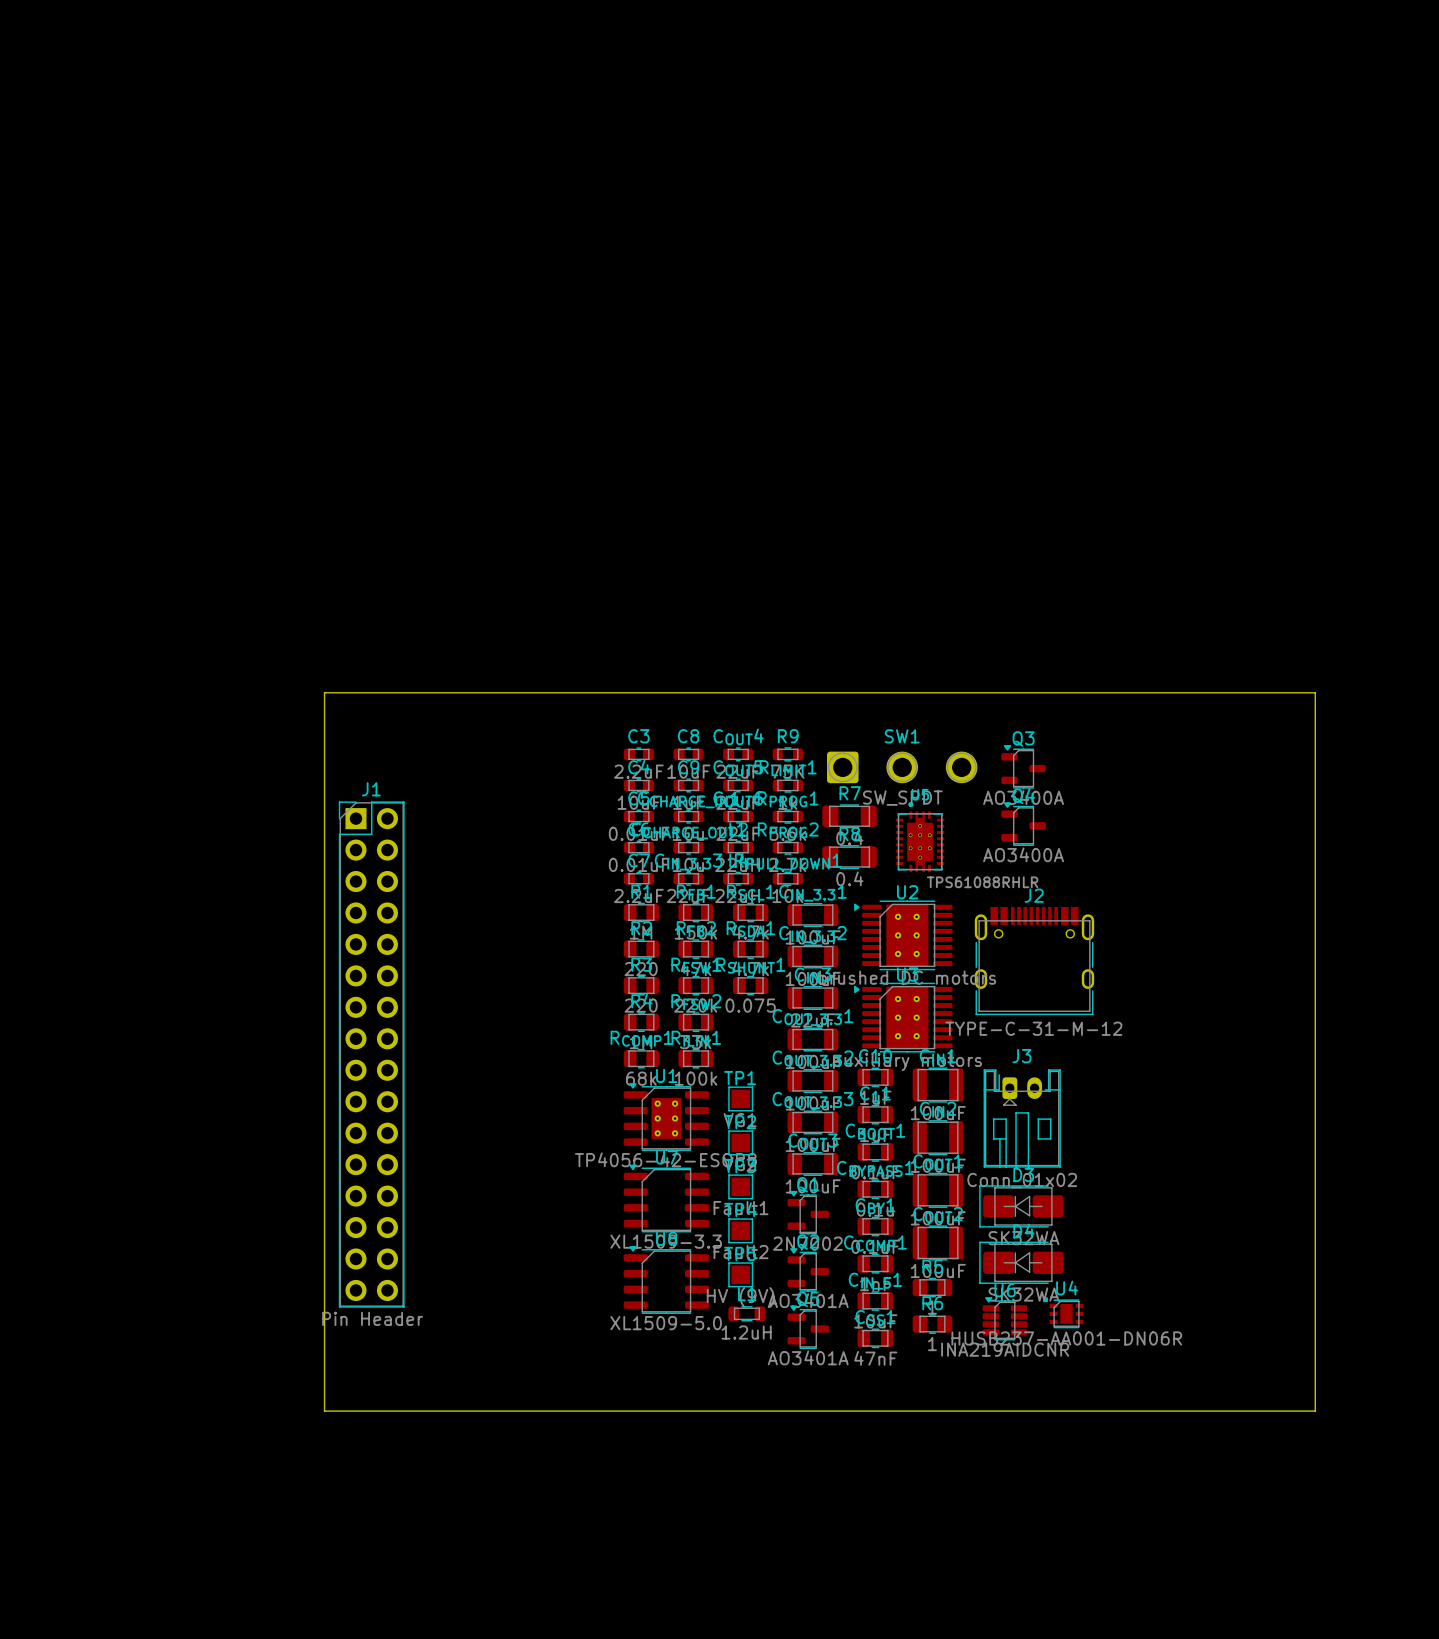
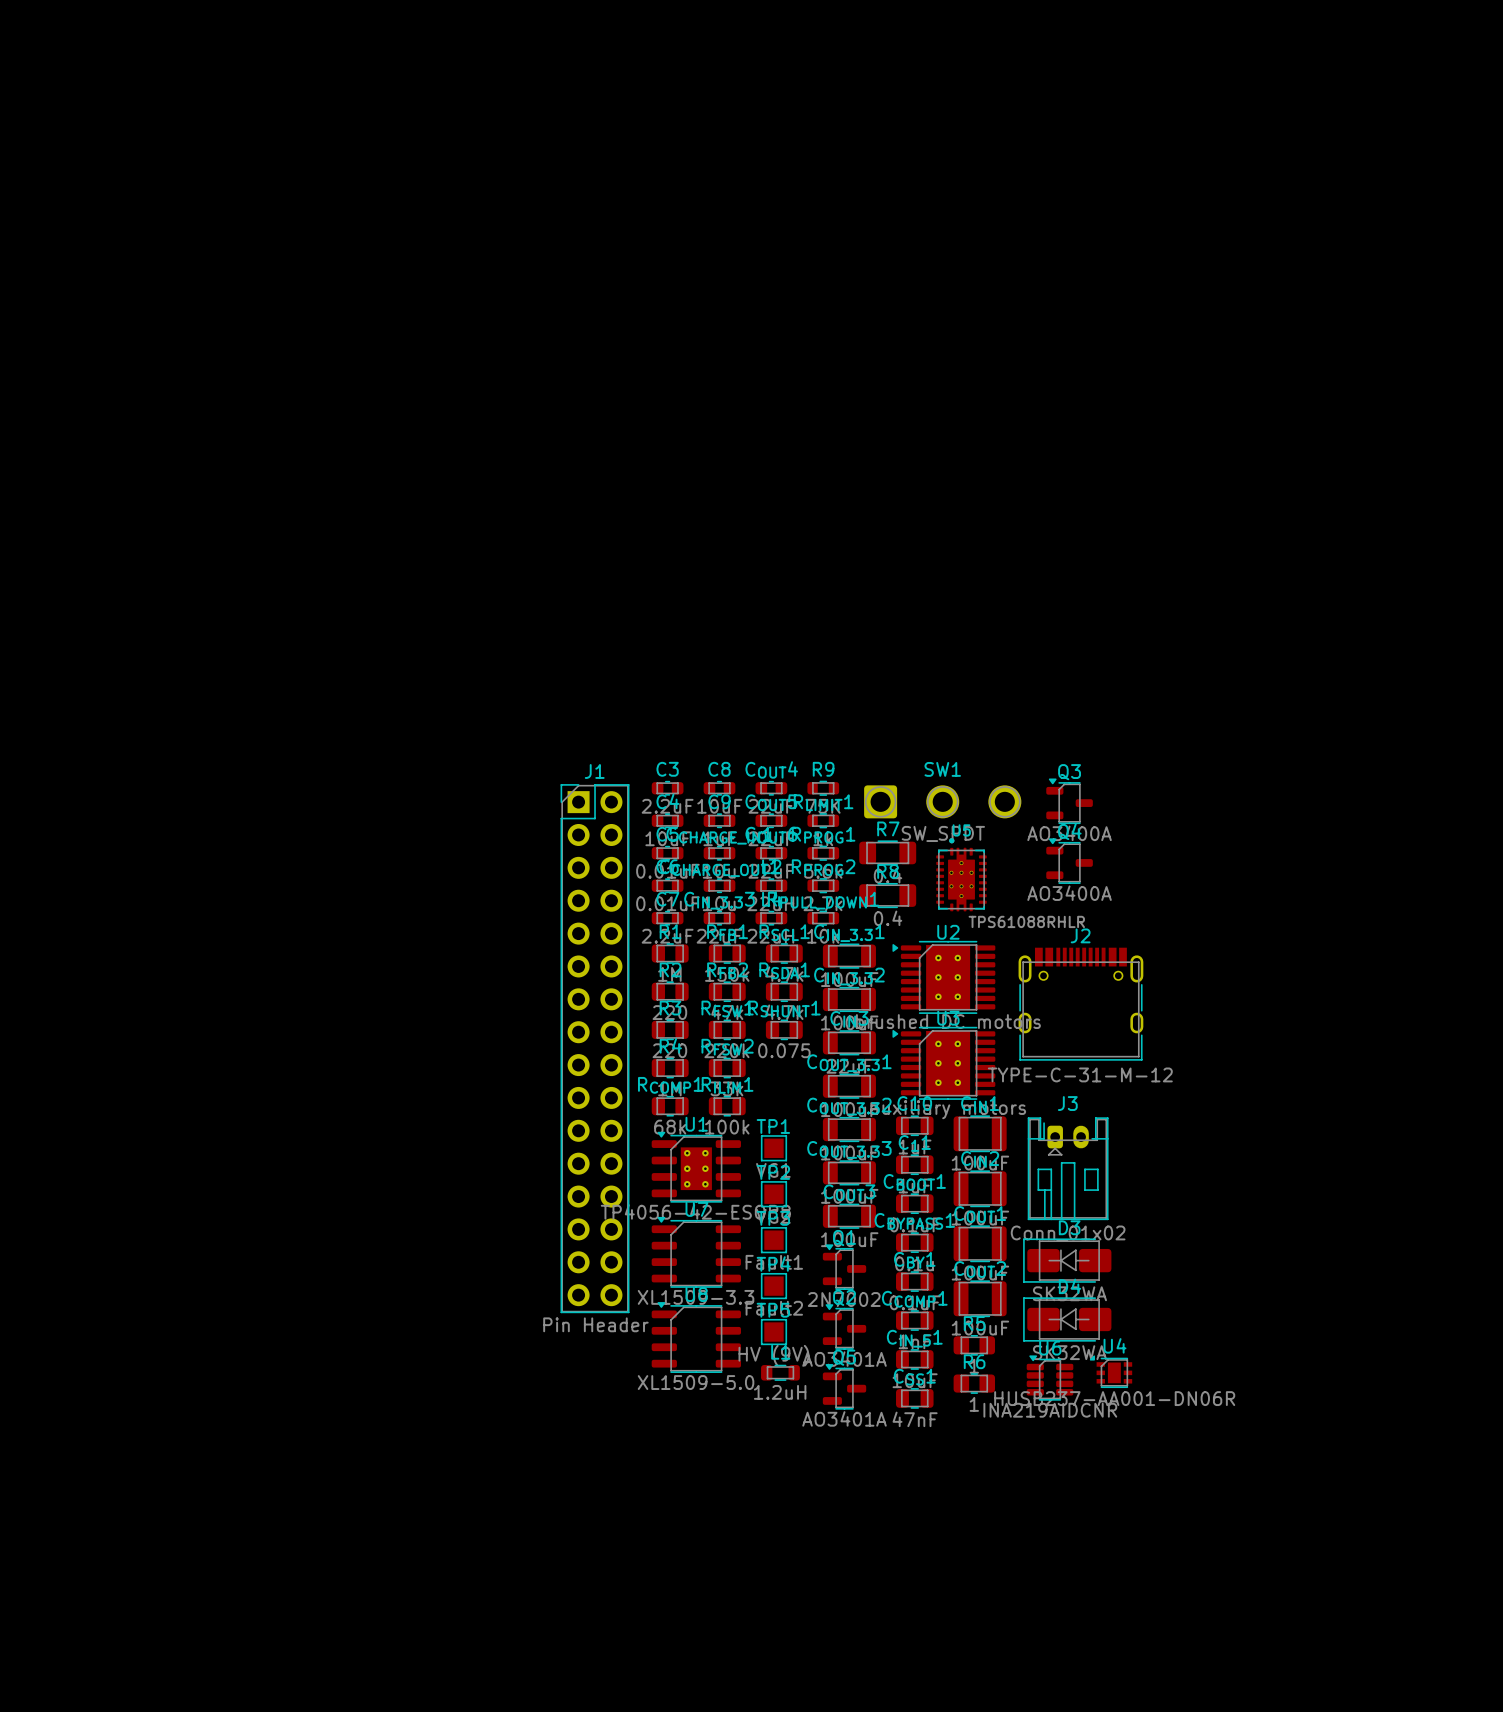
board edge: (324, 692) (324, 1411) (1315, 1411) (1315, 692) (324, 692) -> none
J1 position: (371, 1054) -> (595, 1048)

